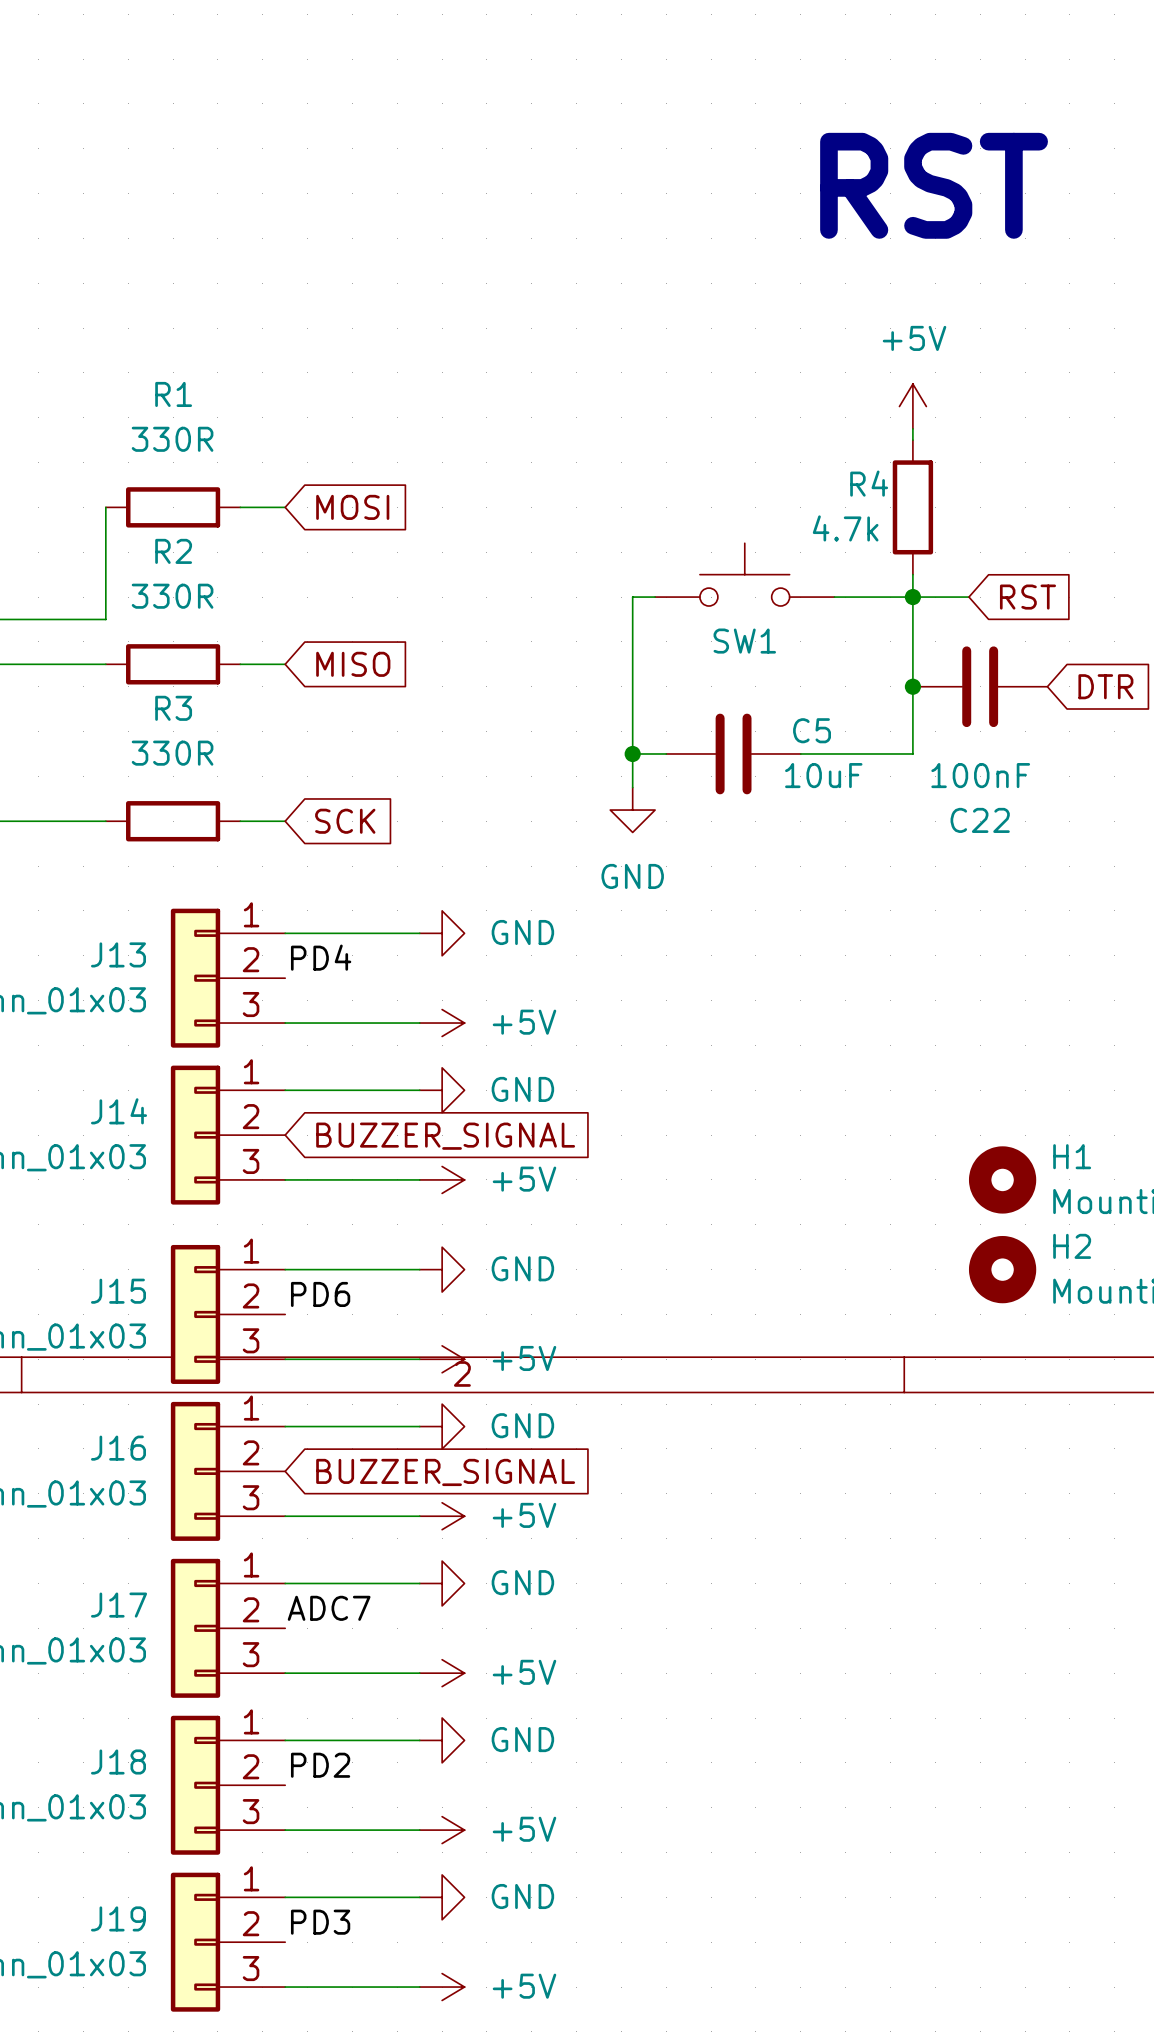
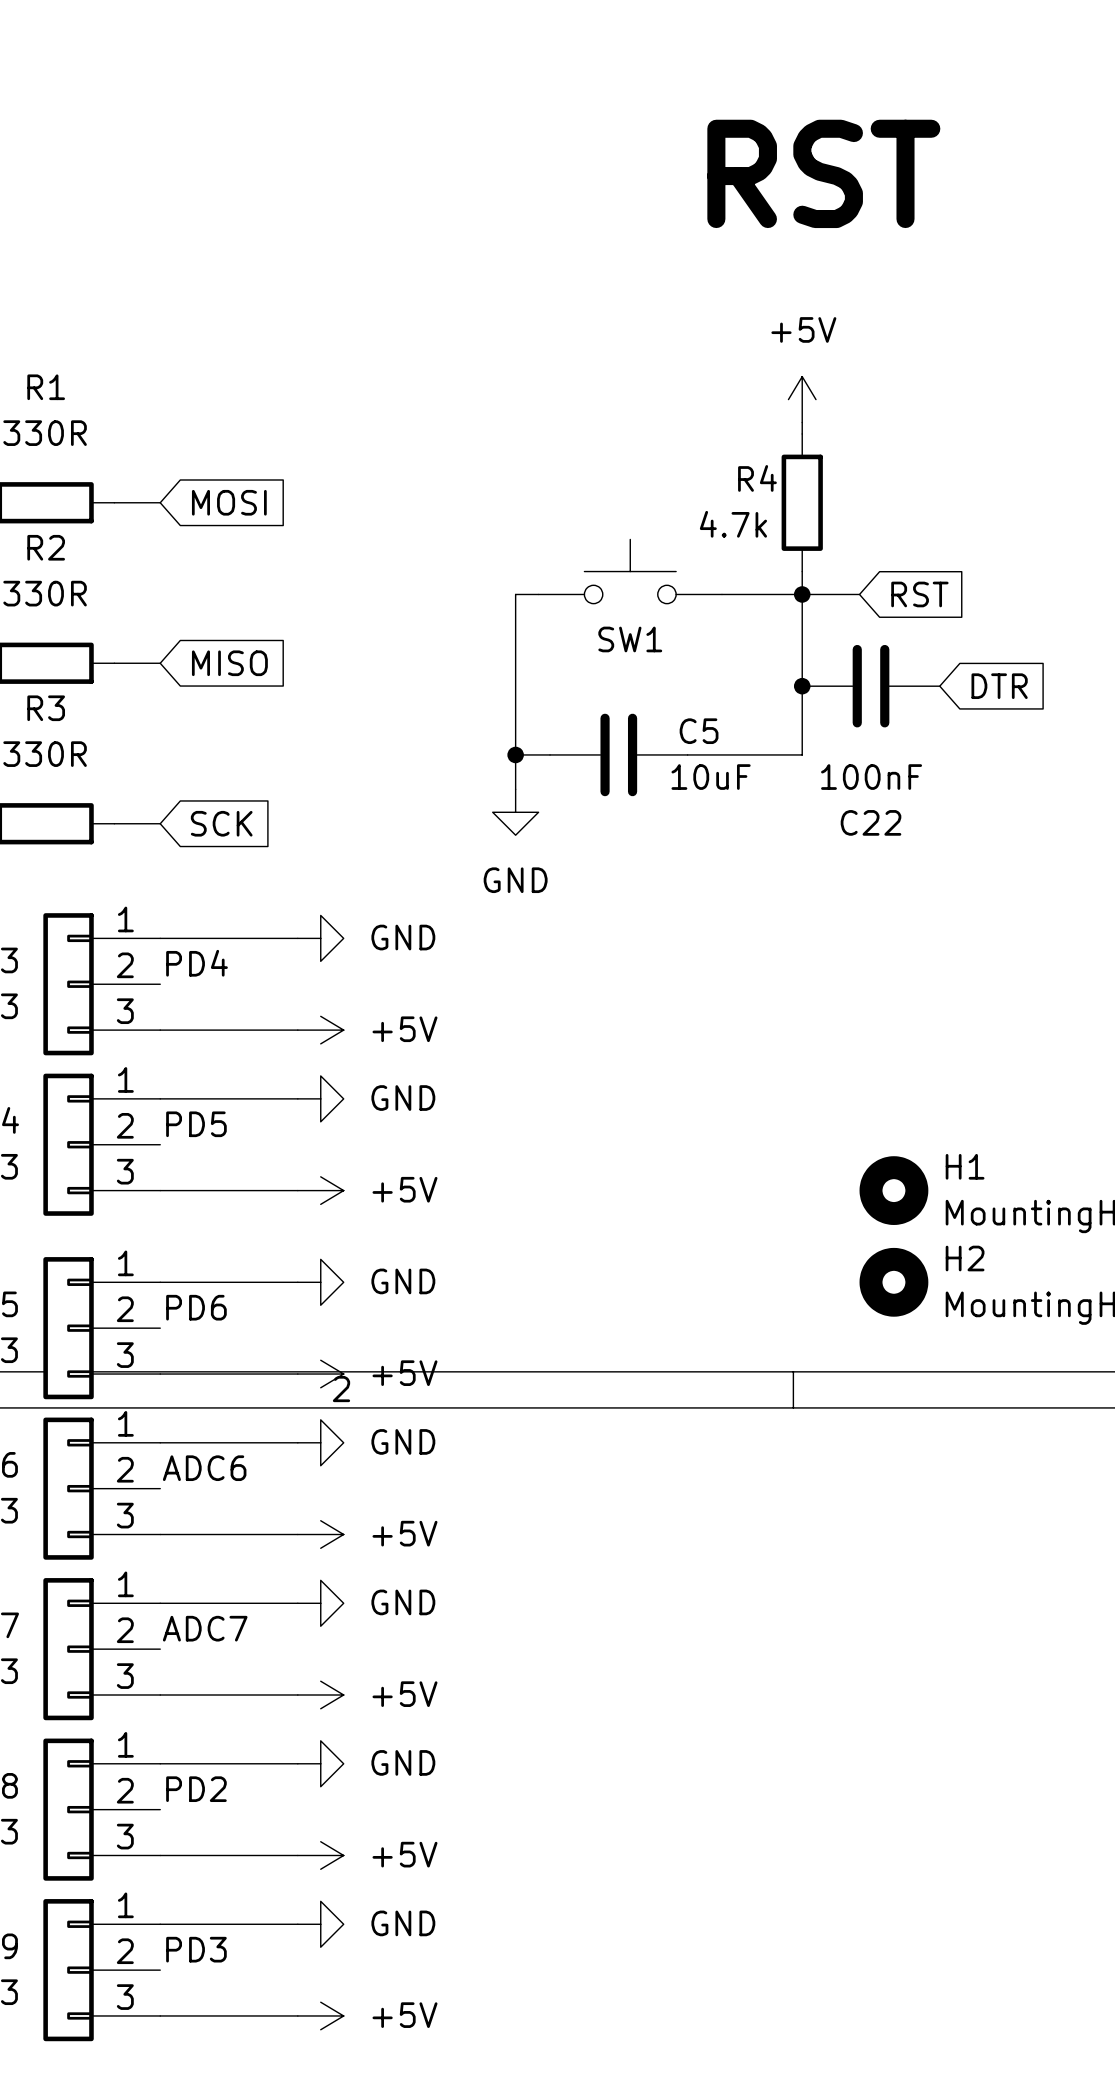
label: none -> PD5 (196, 1124)
global label: BUZZER_SIGNAL (445, 1136) -> none
label: none -> ADC6 (204, 1468)
global label: BUZZER_SIGNAL (445, 1472) -> none

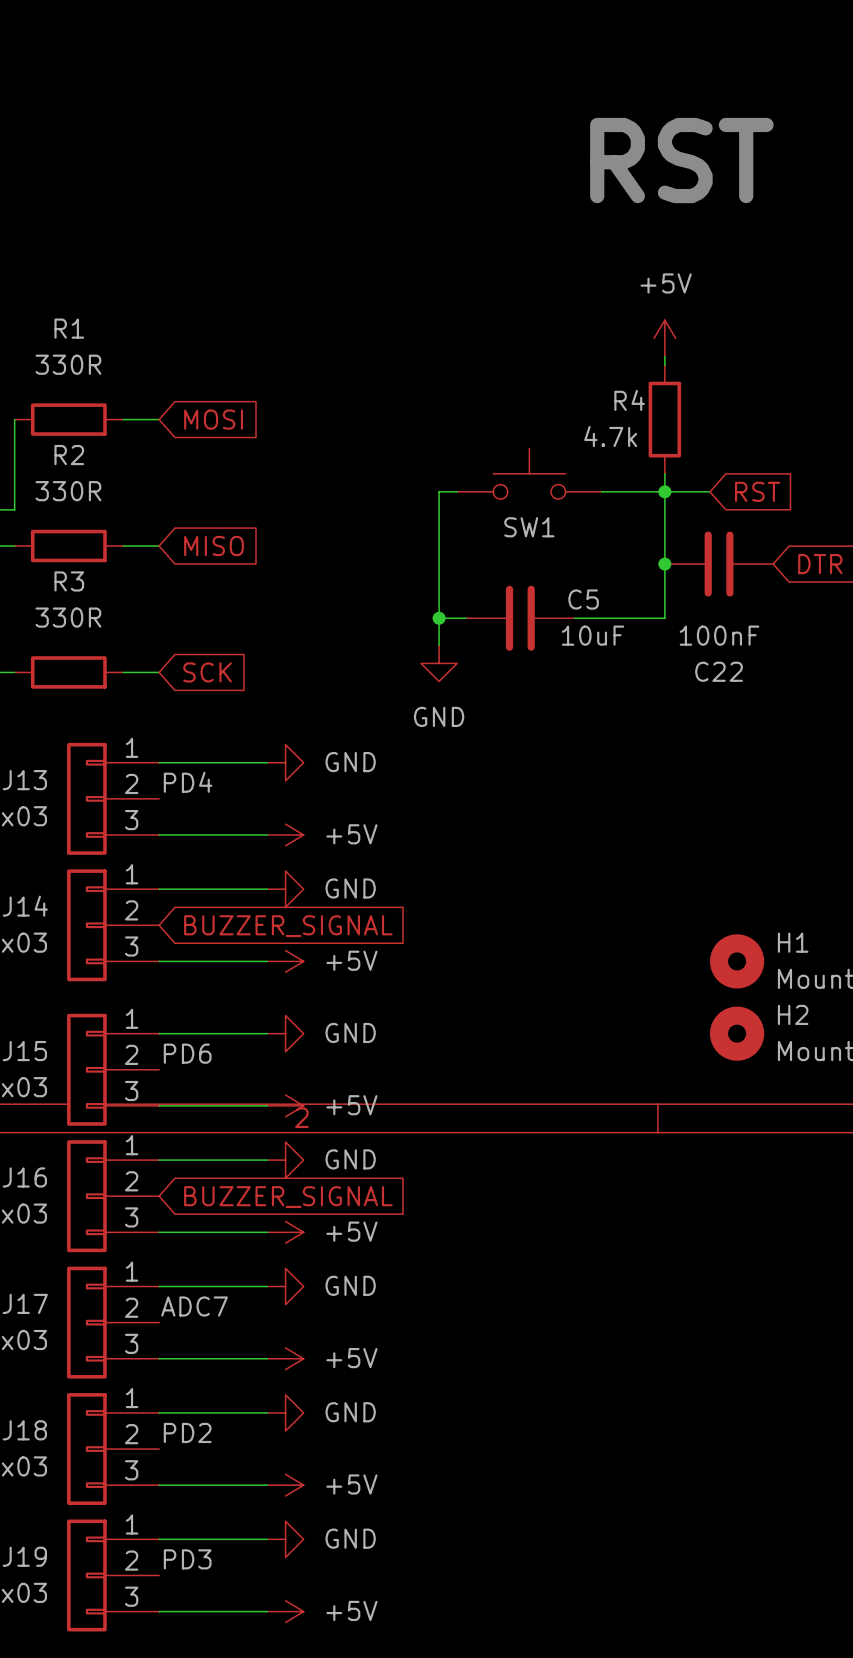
label: PD5 (196, 1124) -> none
global label: none -> BUZZER_SIGNAL (288, 926)
label: ADC6 (204, 1468) -> none
global label: none -> BUZZER_SIGNAL (288, 1197)

